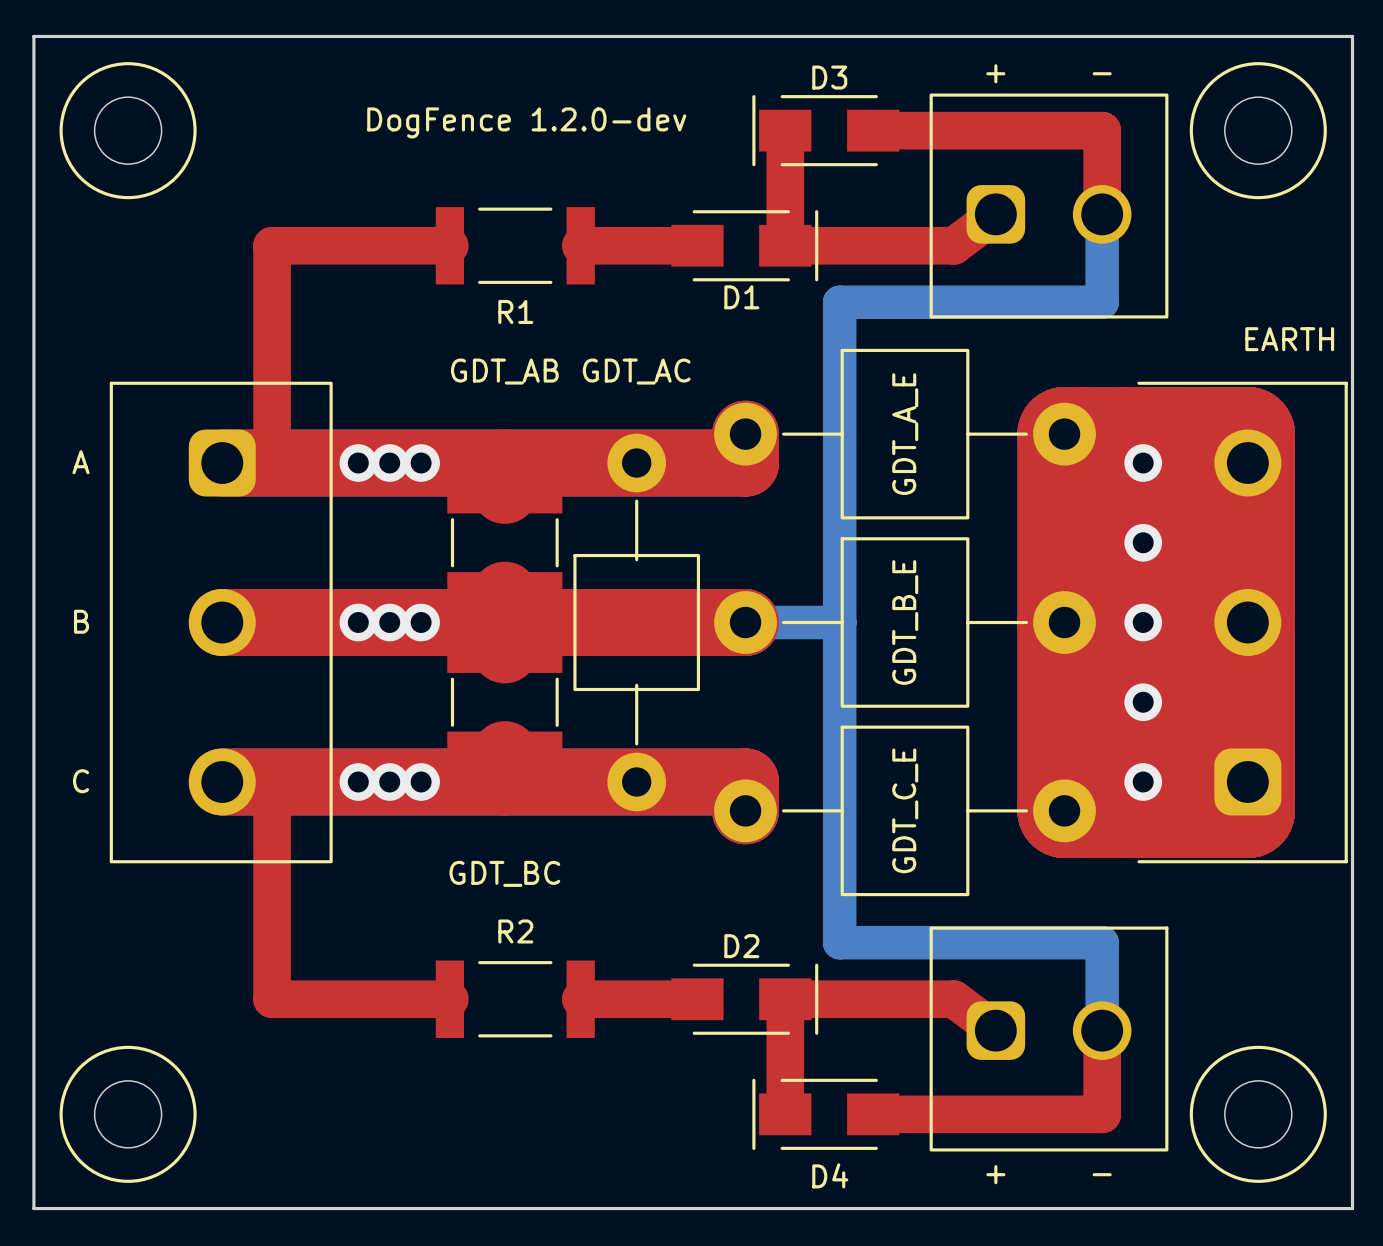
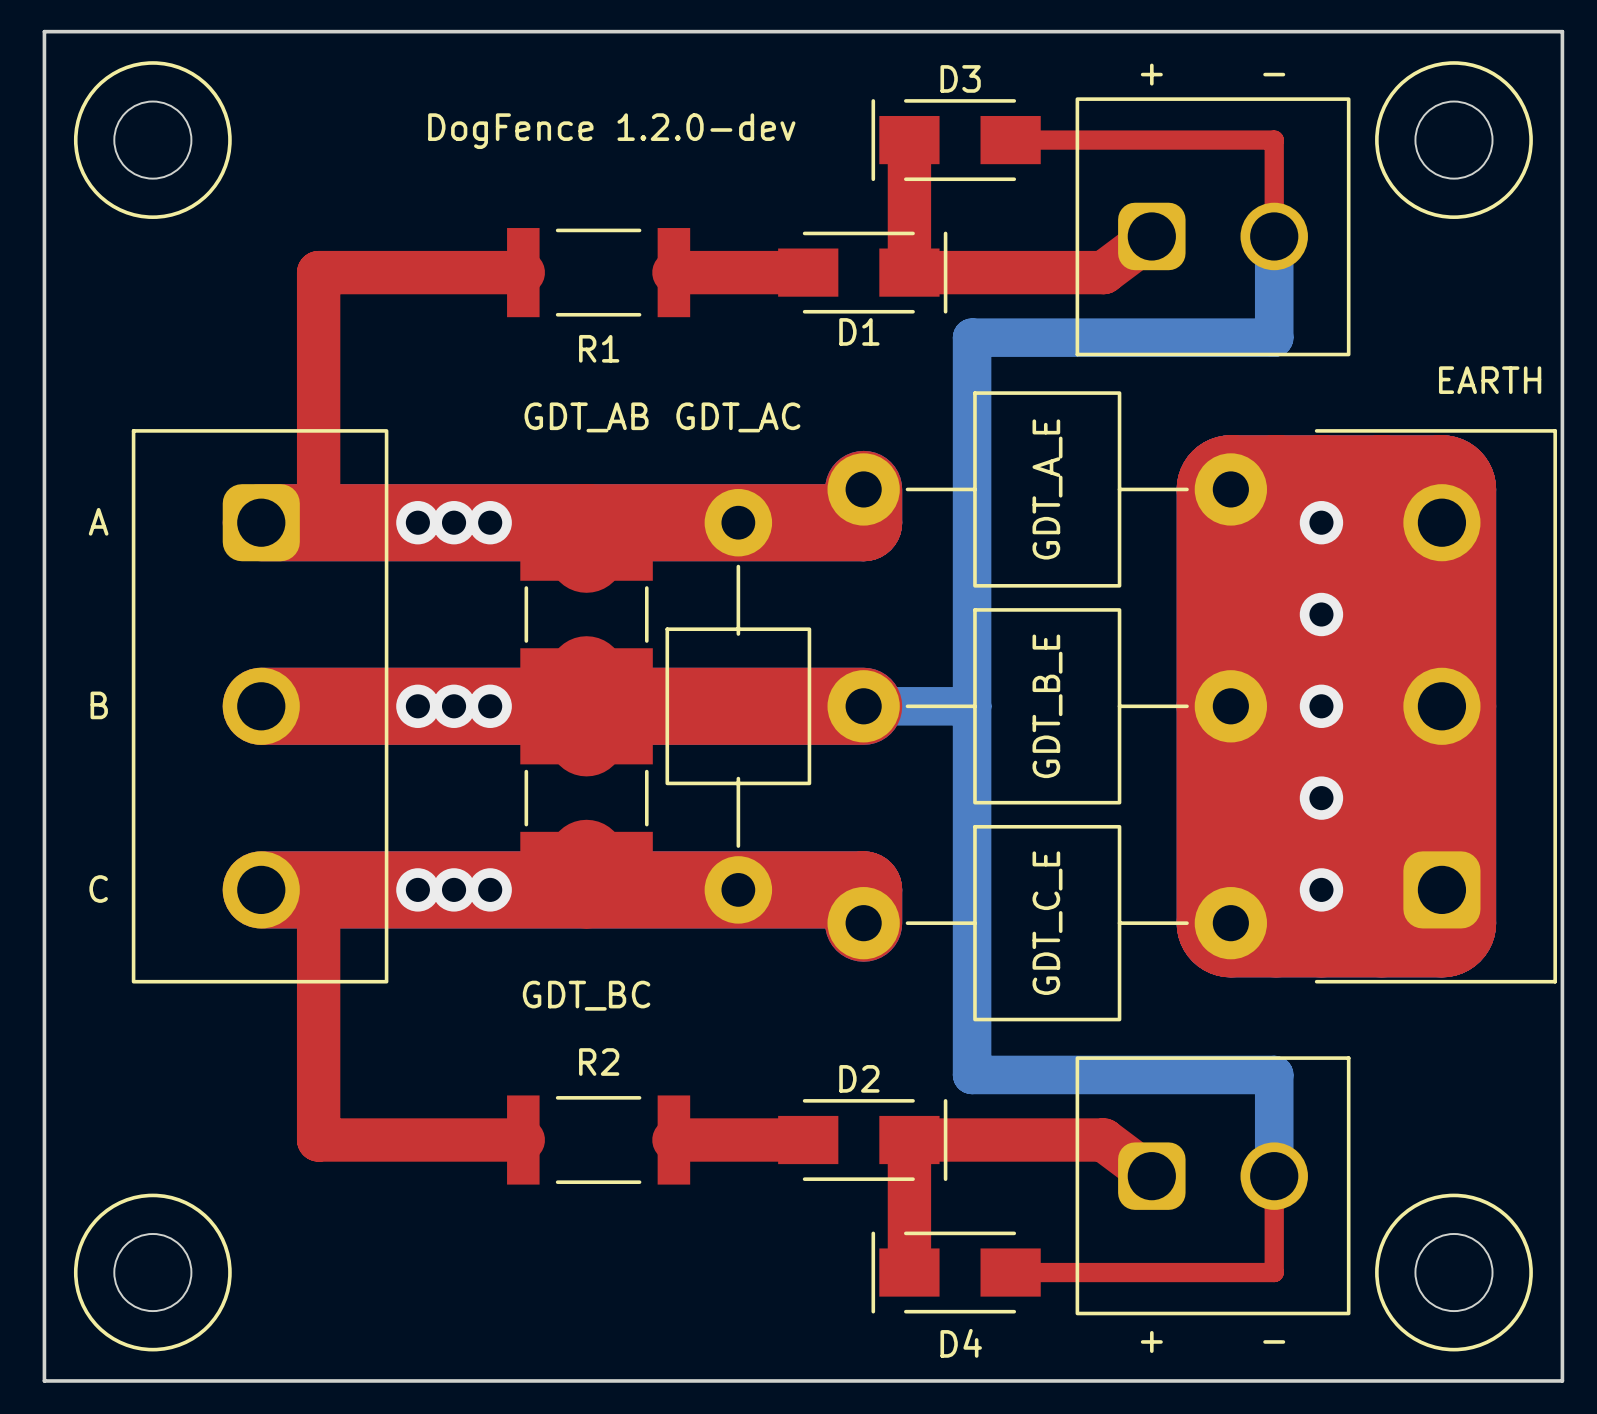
top track width: thick (873, 130) (1102, 130) (1102, 214) -> thin (1010, 140) (1274, 140) (1274, 236)
top track width: thick (1102, 1030) (1102, 1114) (873, 1114) -> thin (1274, 1176) (1274, 1272) (1010, 1272)

